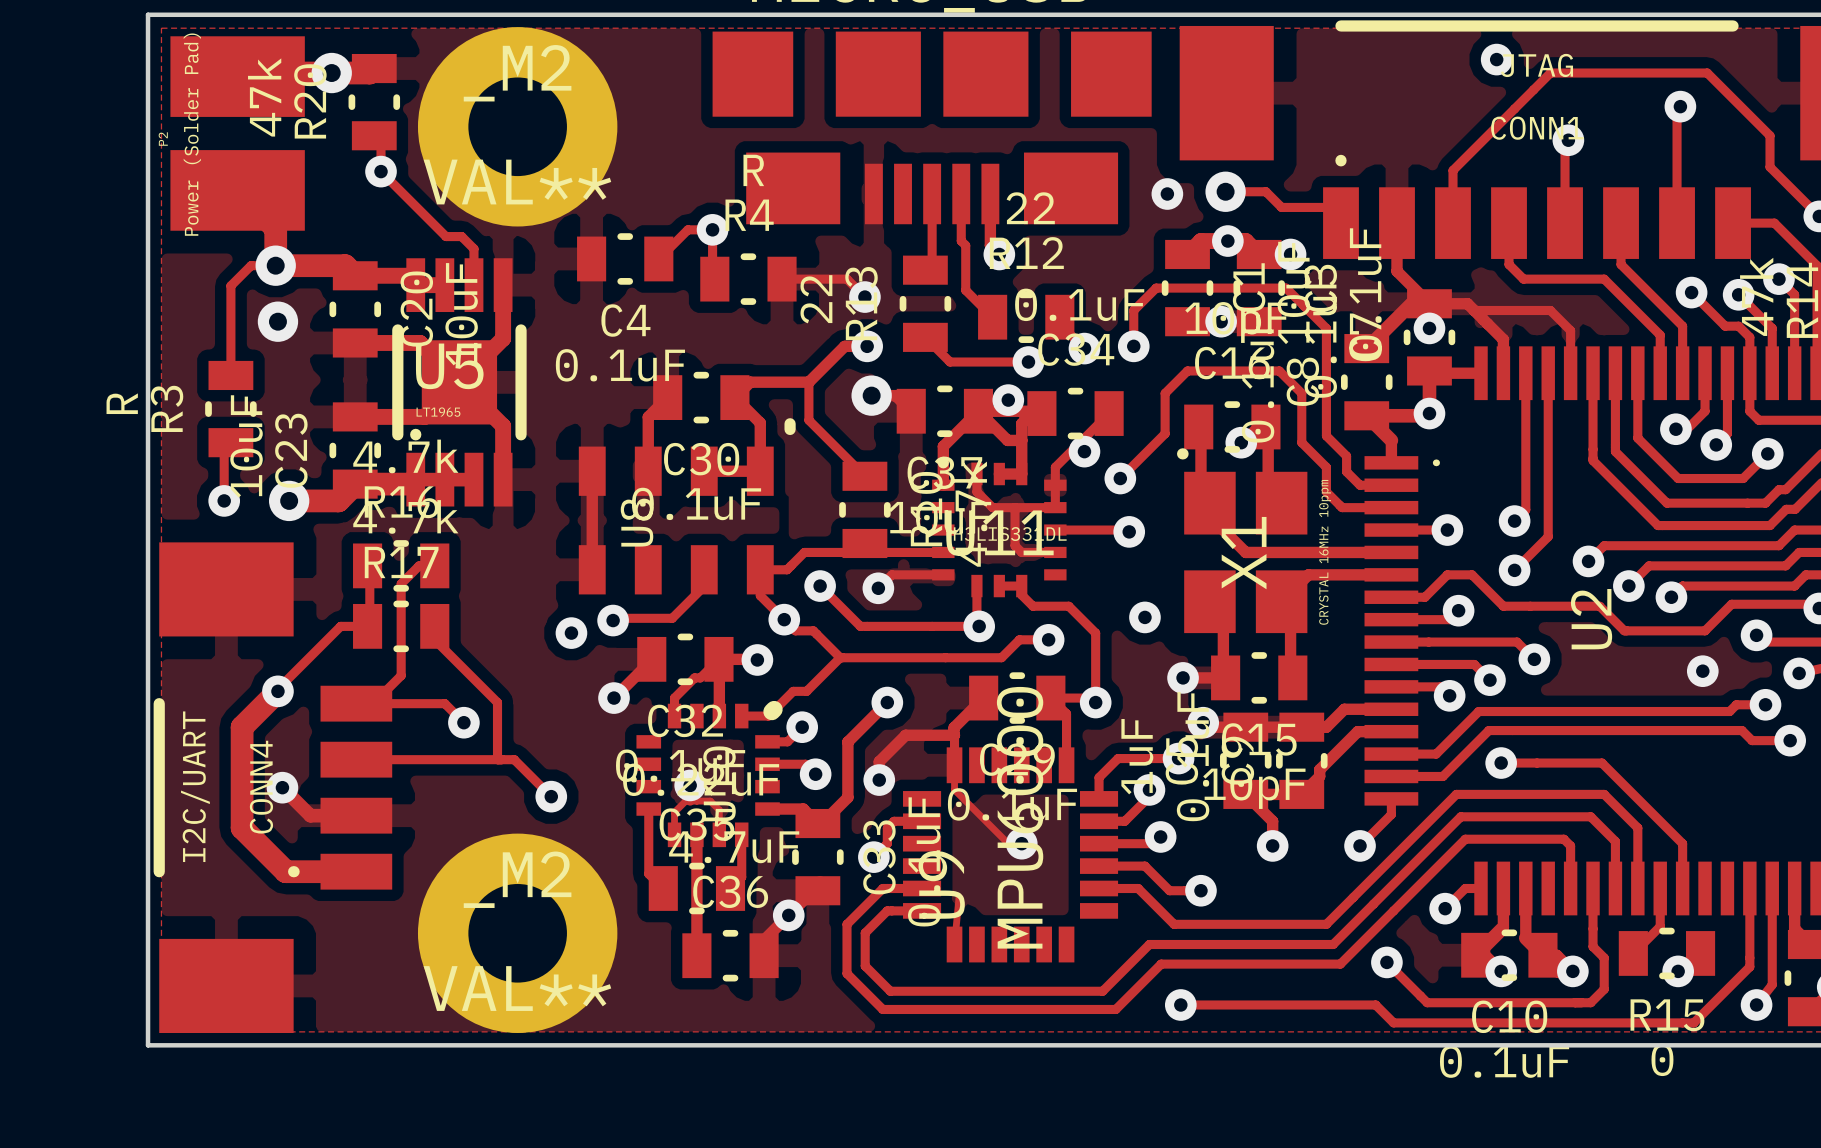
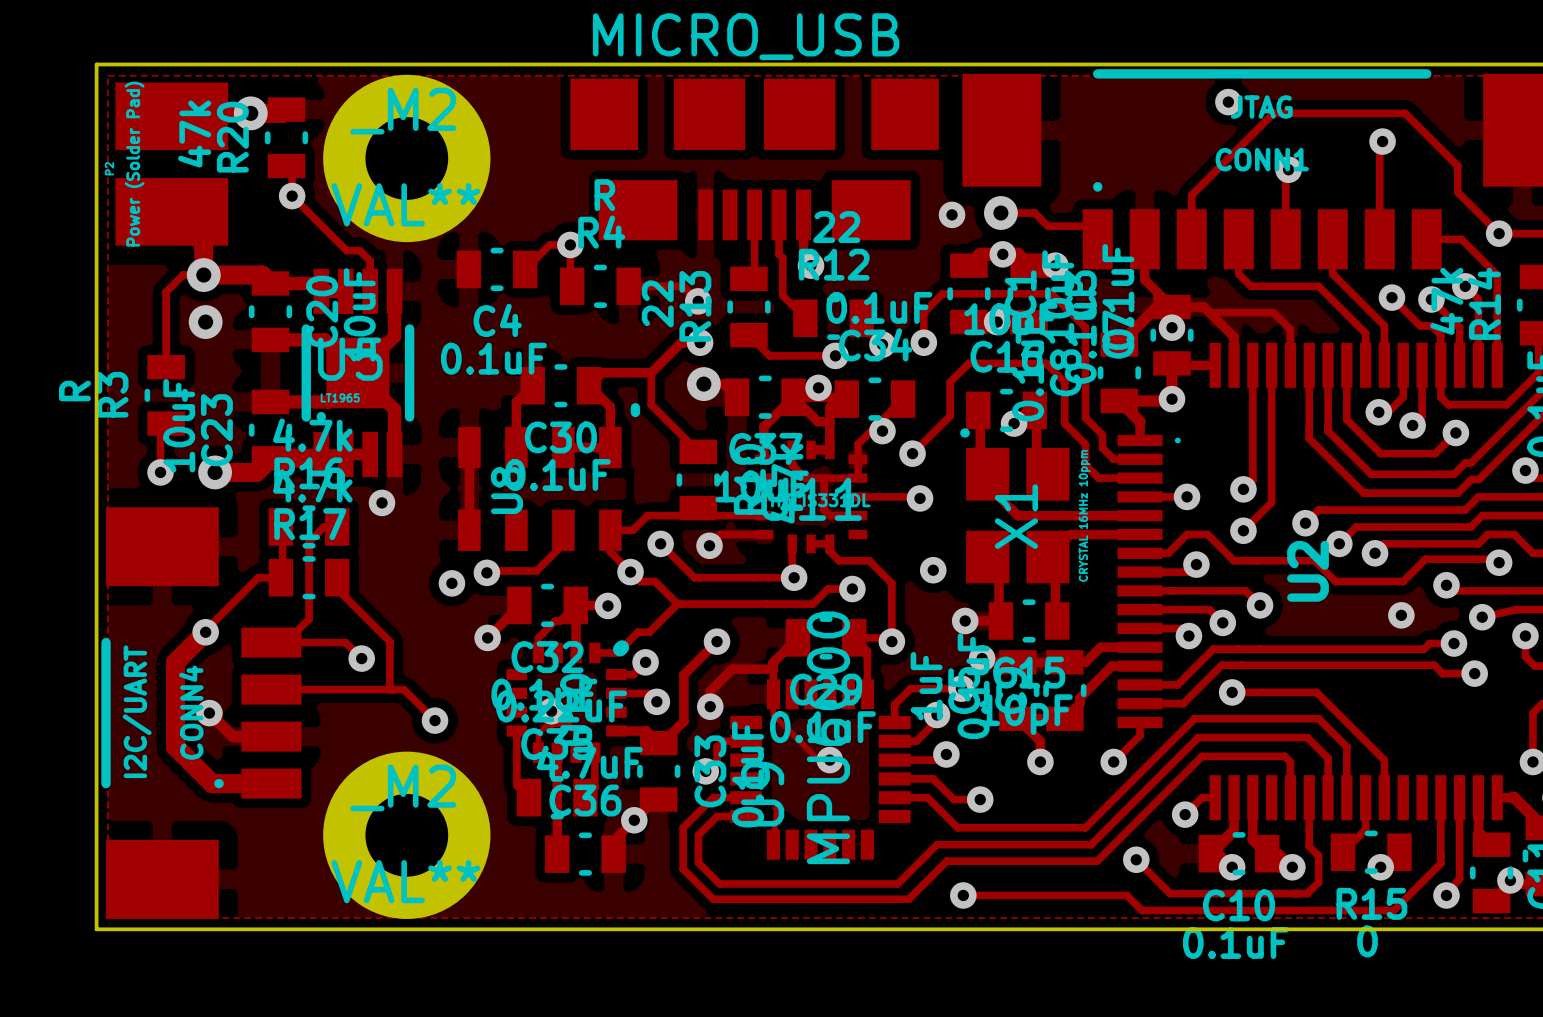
via: none -> (382, 502)

